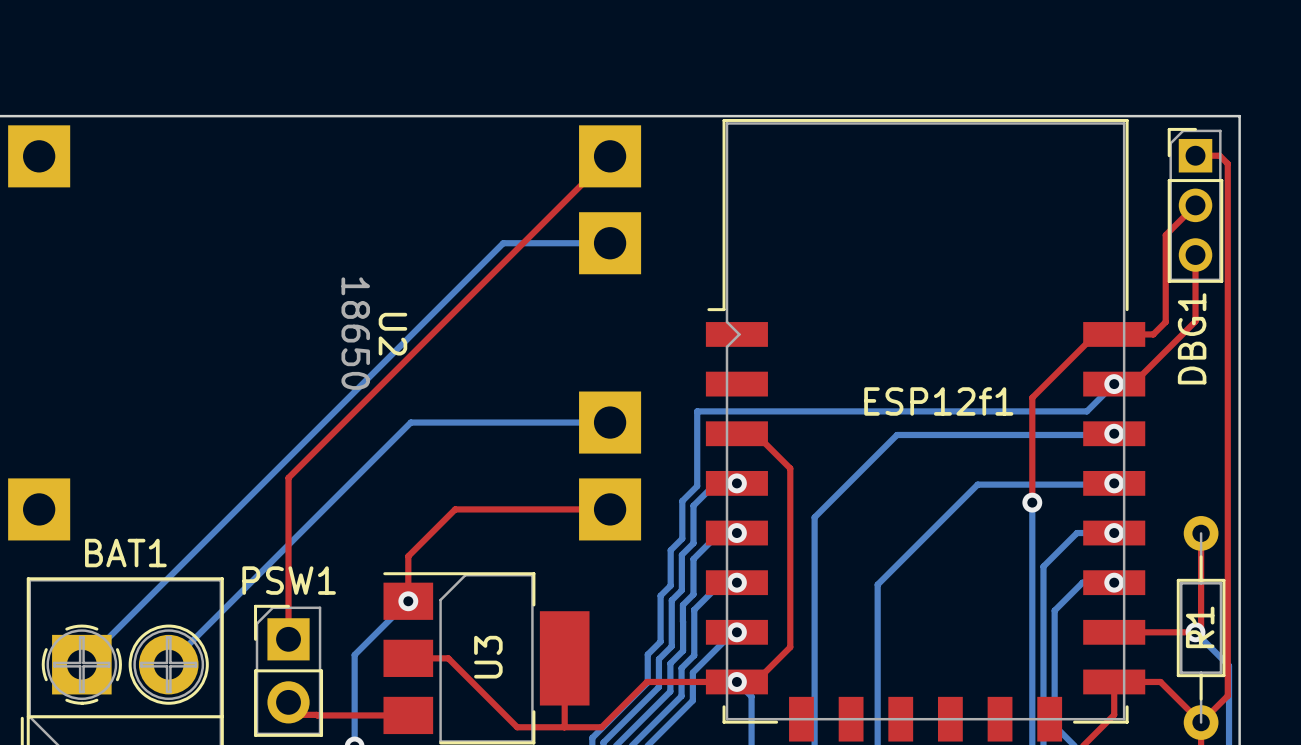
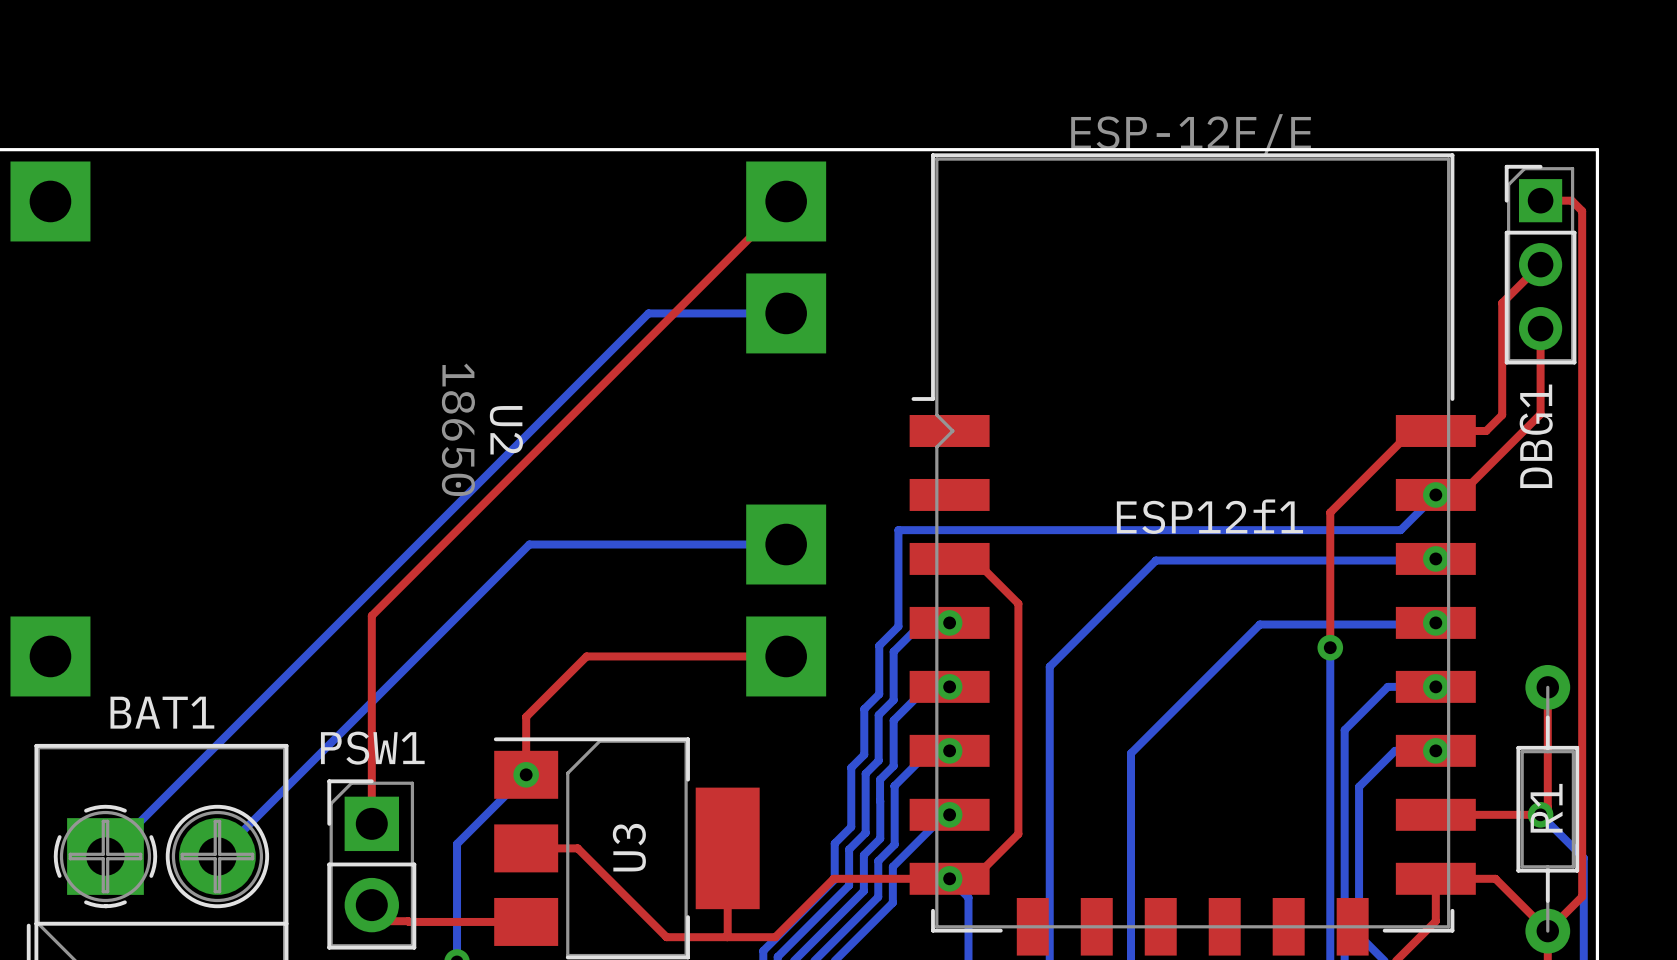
ESP12f1 value: none -> ESP-12F/E (1191, 134)

